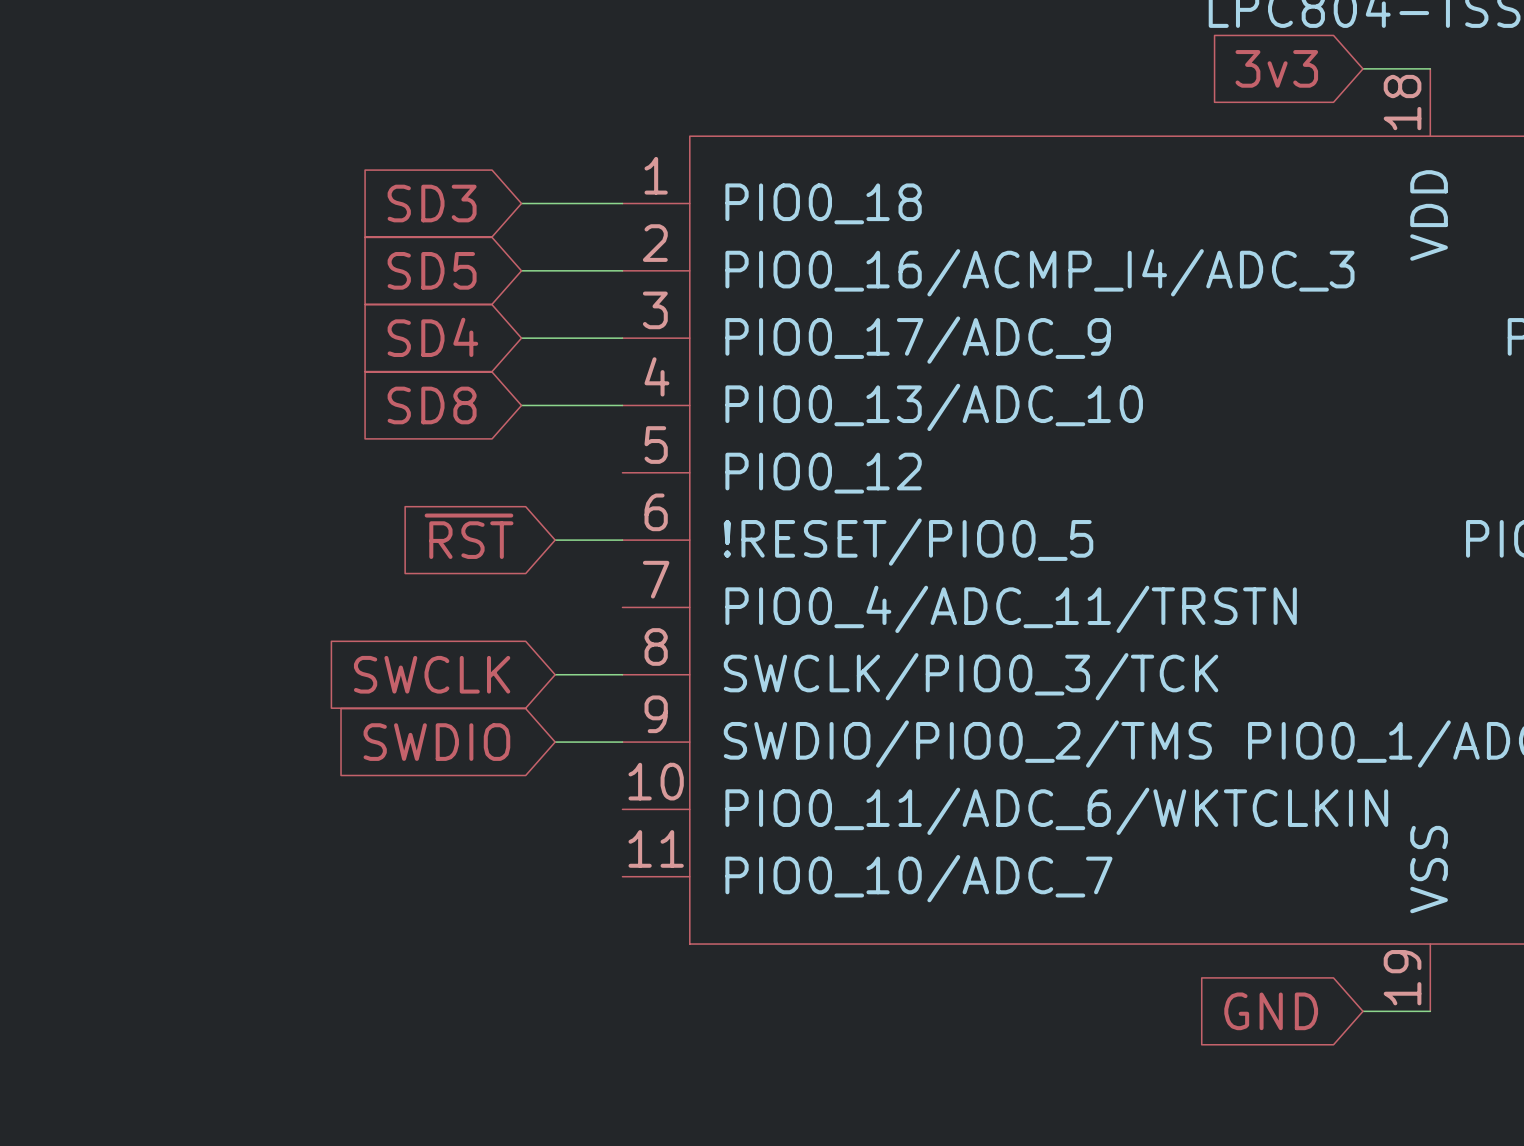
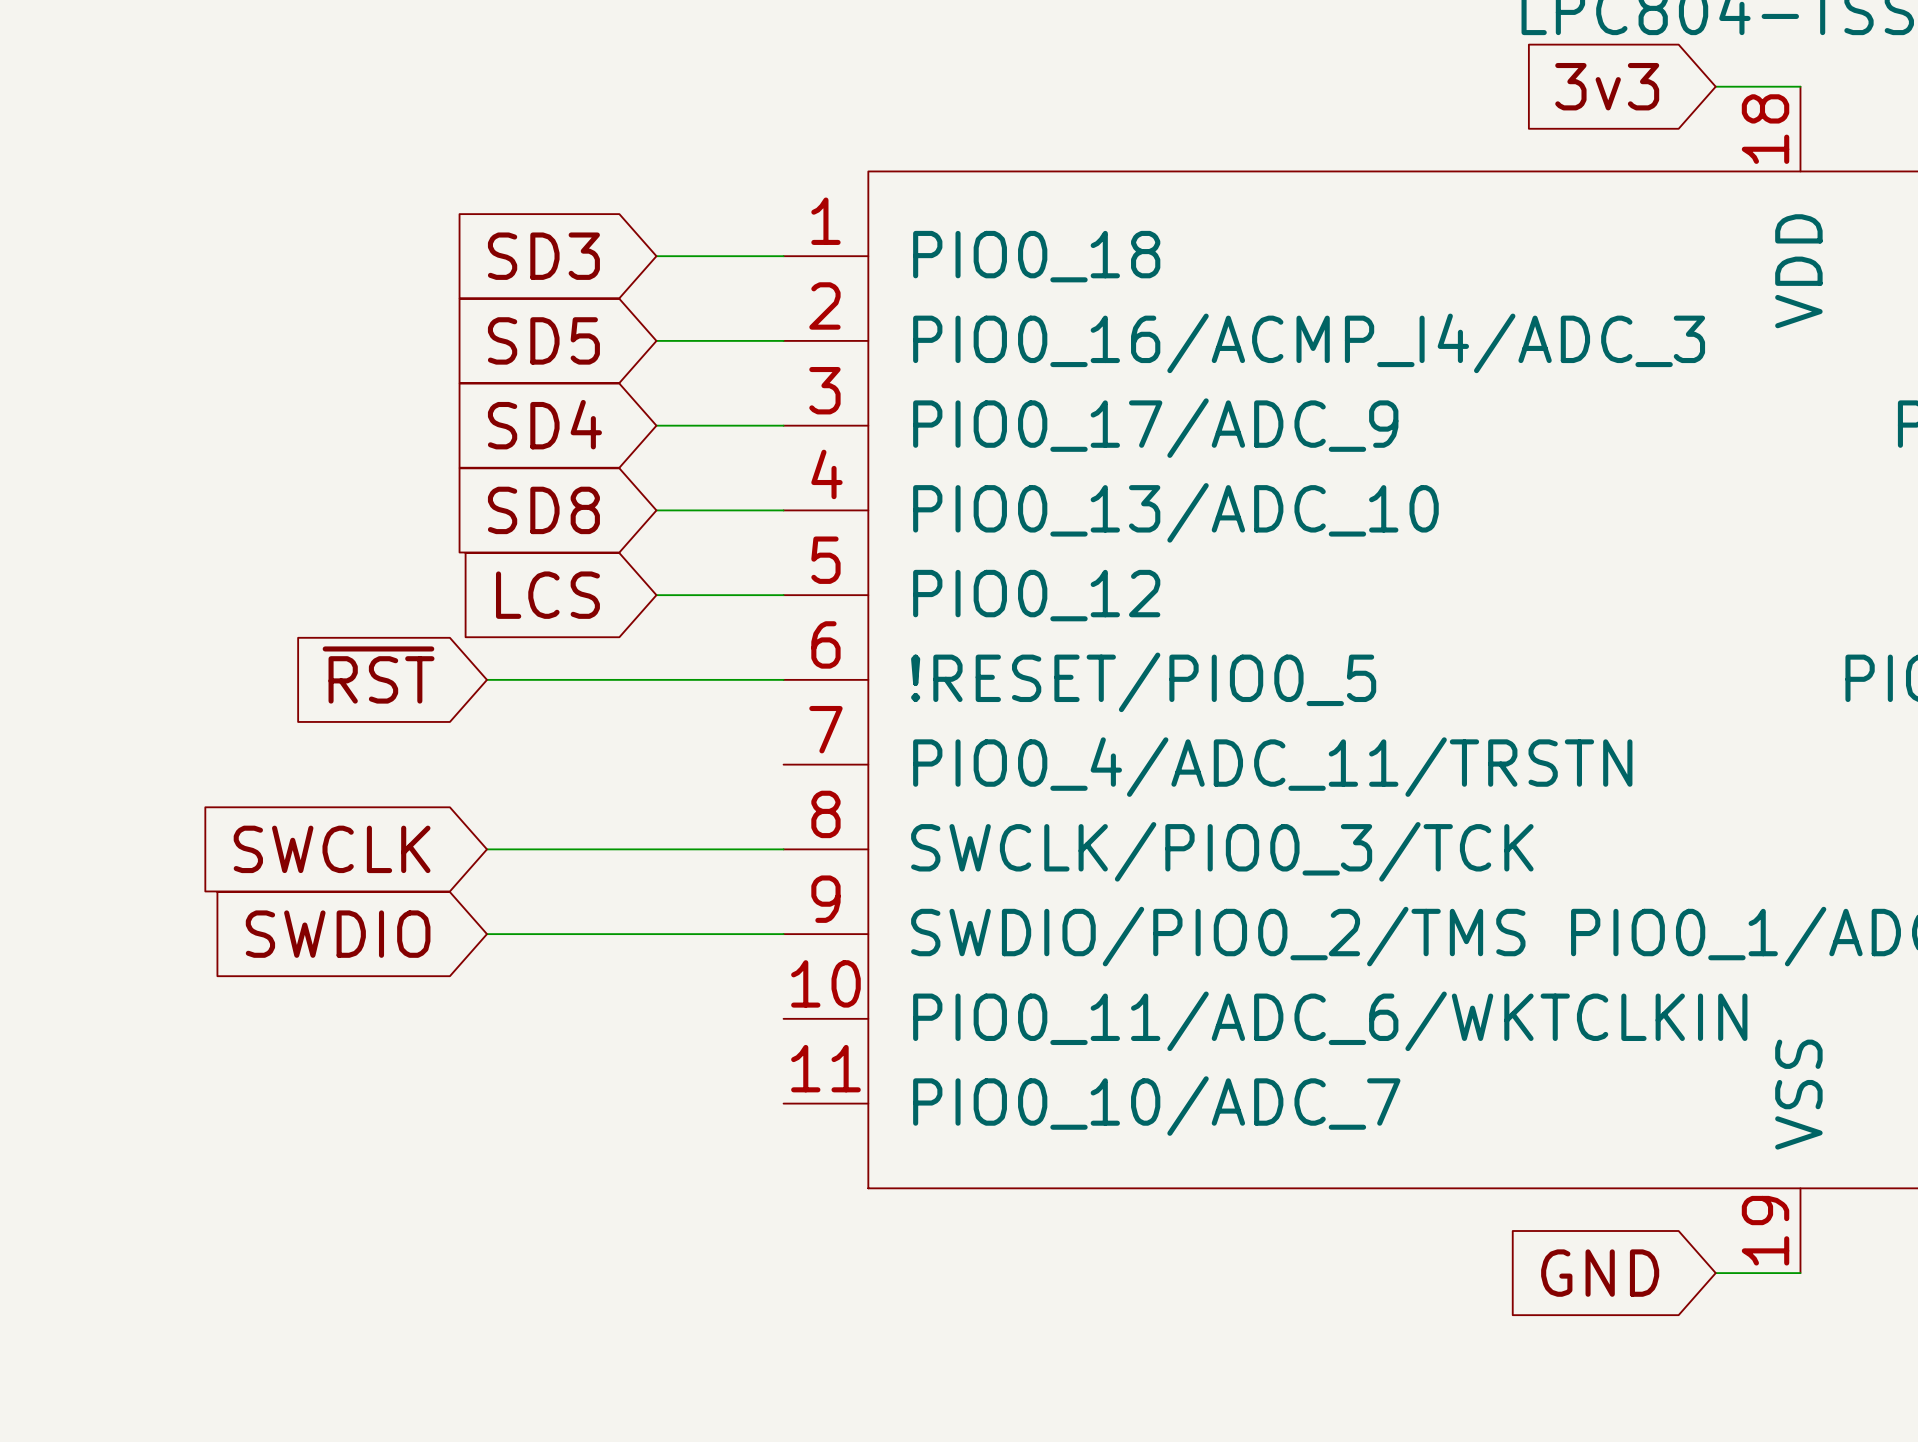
global label: none -> LCS (547, 595)
wire: none -> (656, 595) (783, 595)
global label position: ~{RST} (469, 536) -> ~{RST} (378, 675)
wire: none -> (486, 679) (698, 679)
wire: none -> (486, 849) (698, 849)
global label position: SWCLK (432, 674) -> SWCLK (332, 849)
wire: none -> (486, 934) (698, 934)
global label position: SWDIO (436, 742) -> SWDIO (338, 934)

